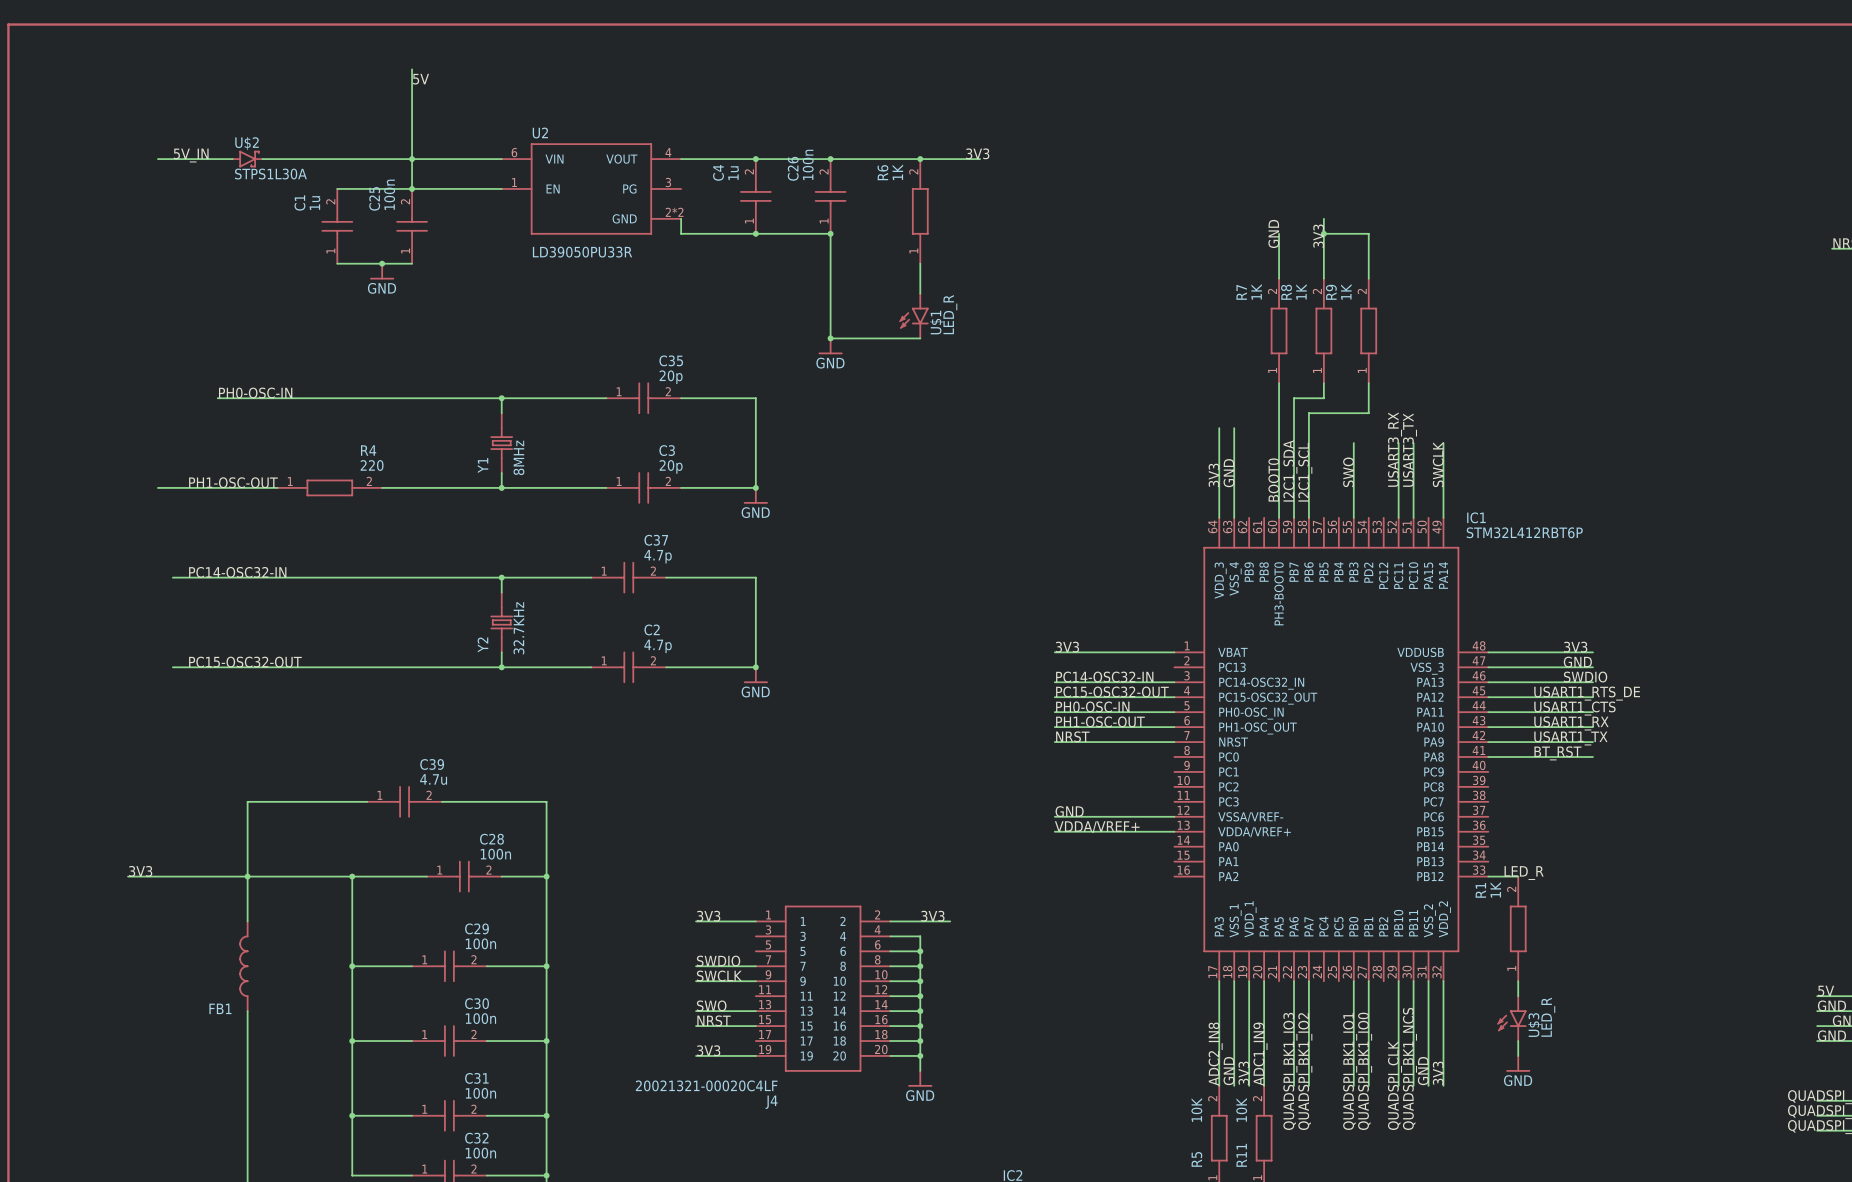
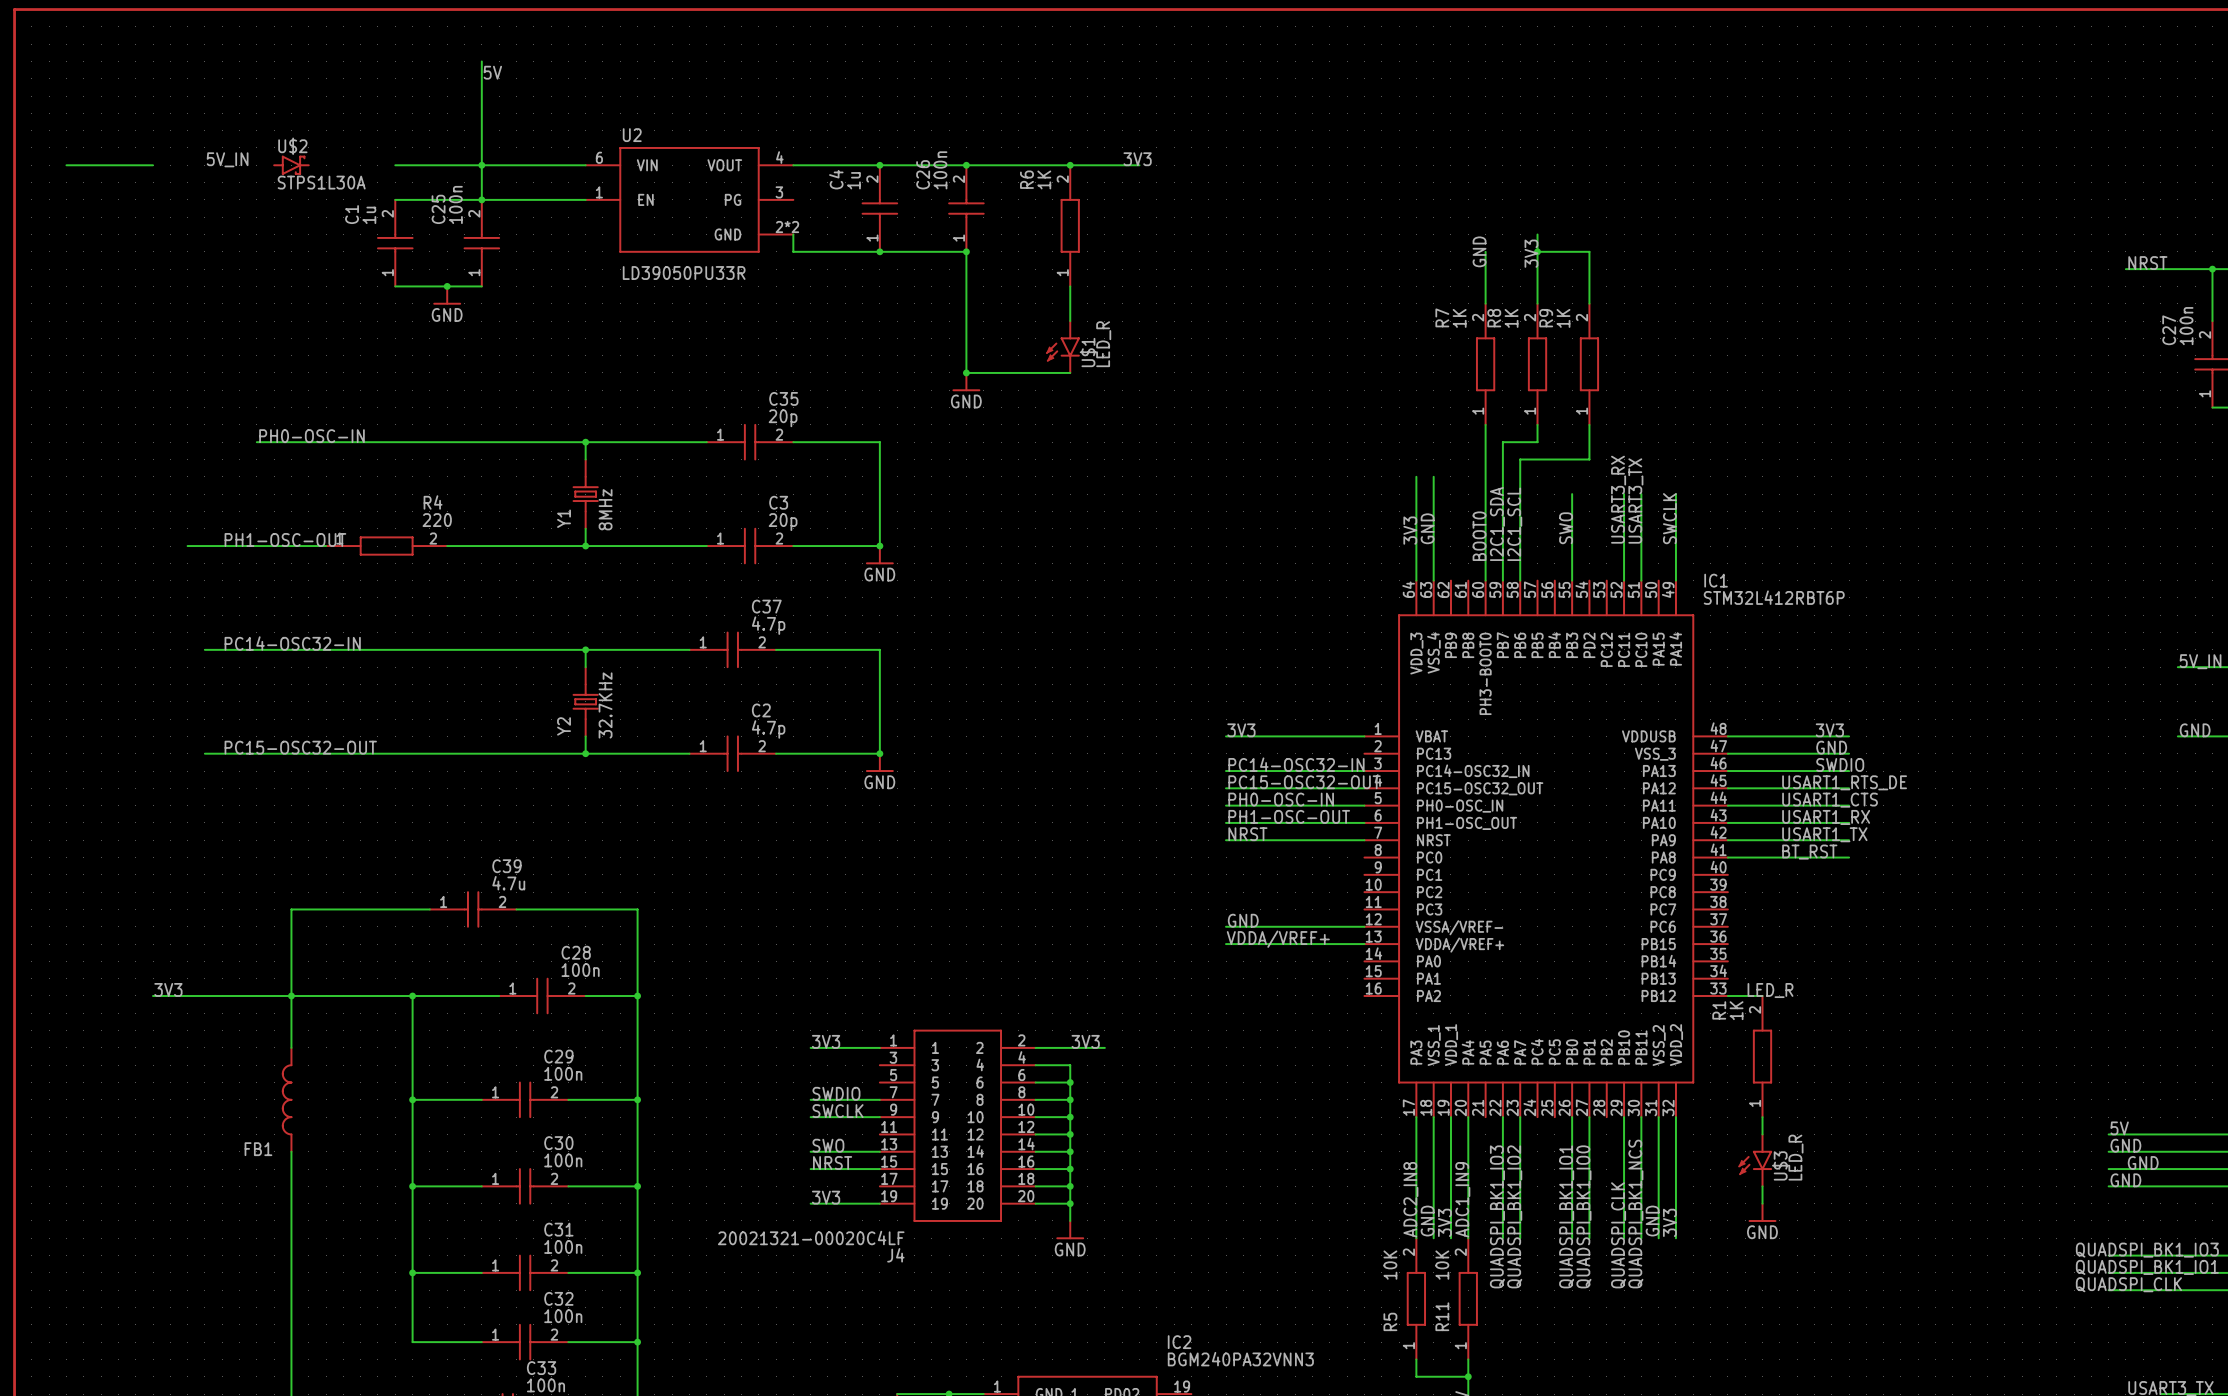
wire: (157, 159) (232, 159) -> (66, 165) (153, 165)
wire: (262, 159) (337, 159) -> none

